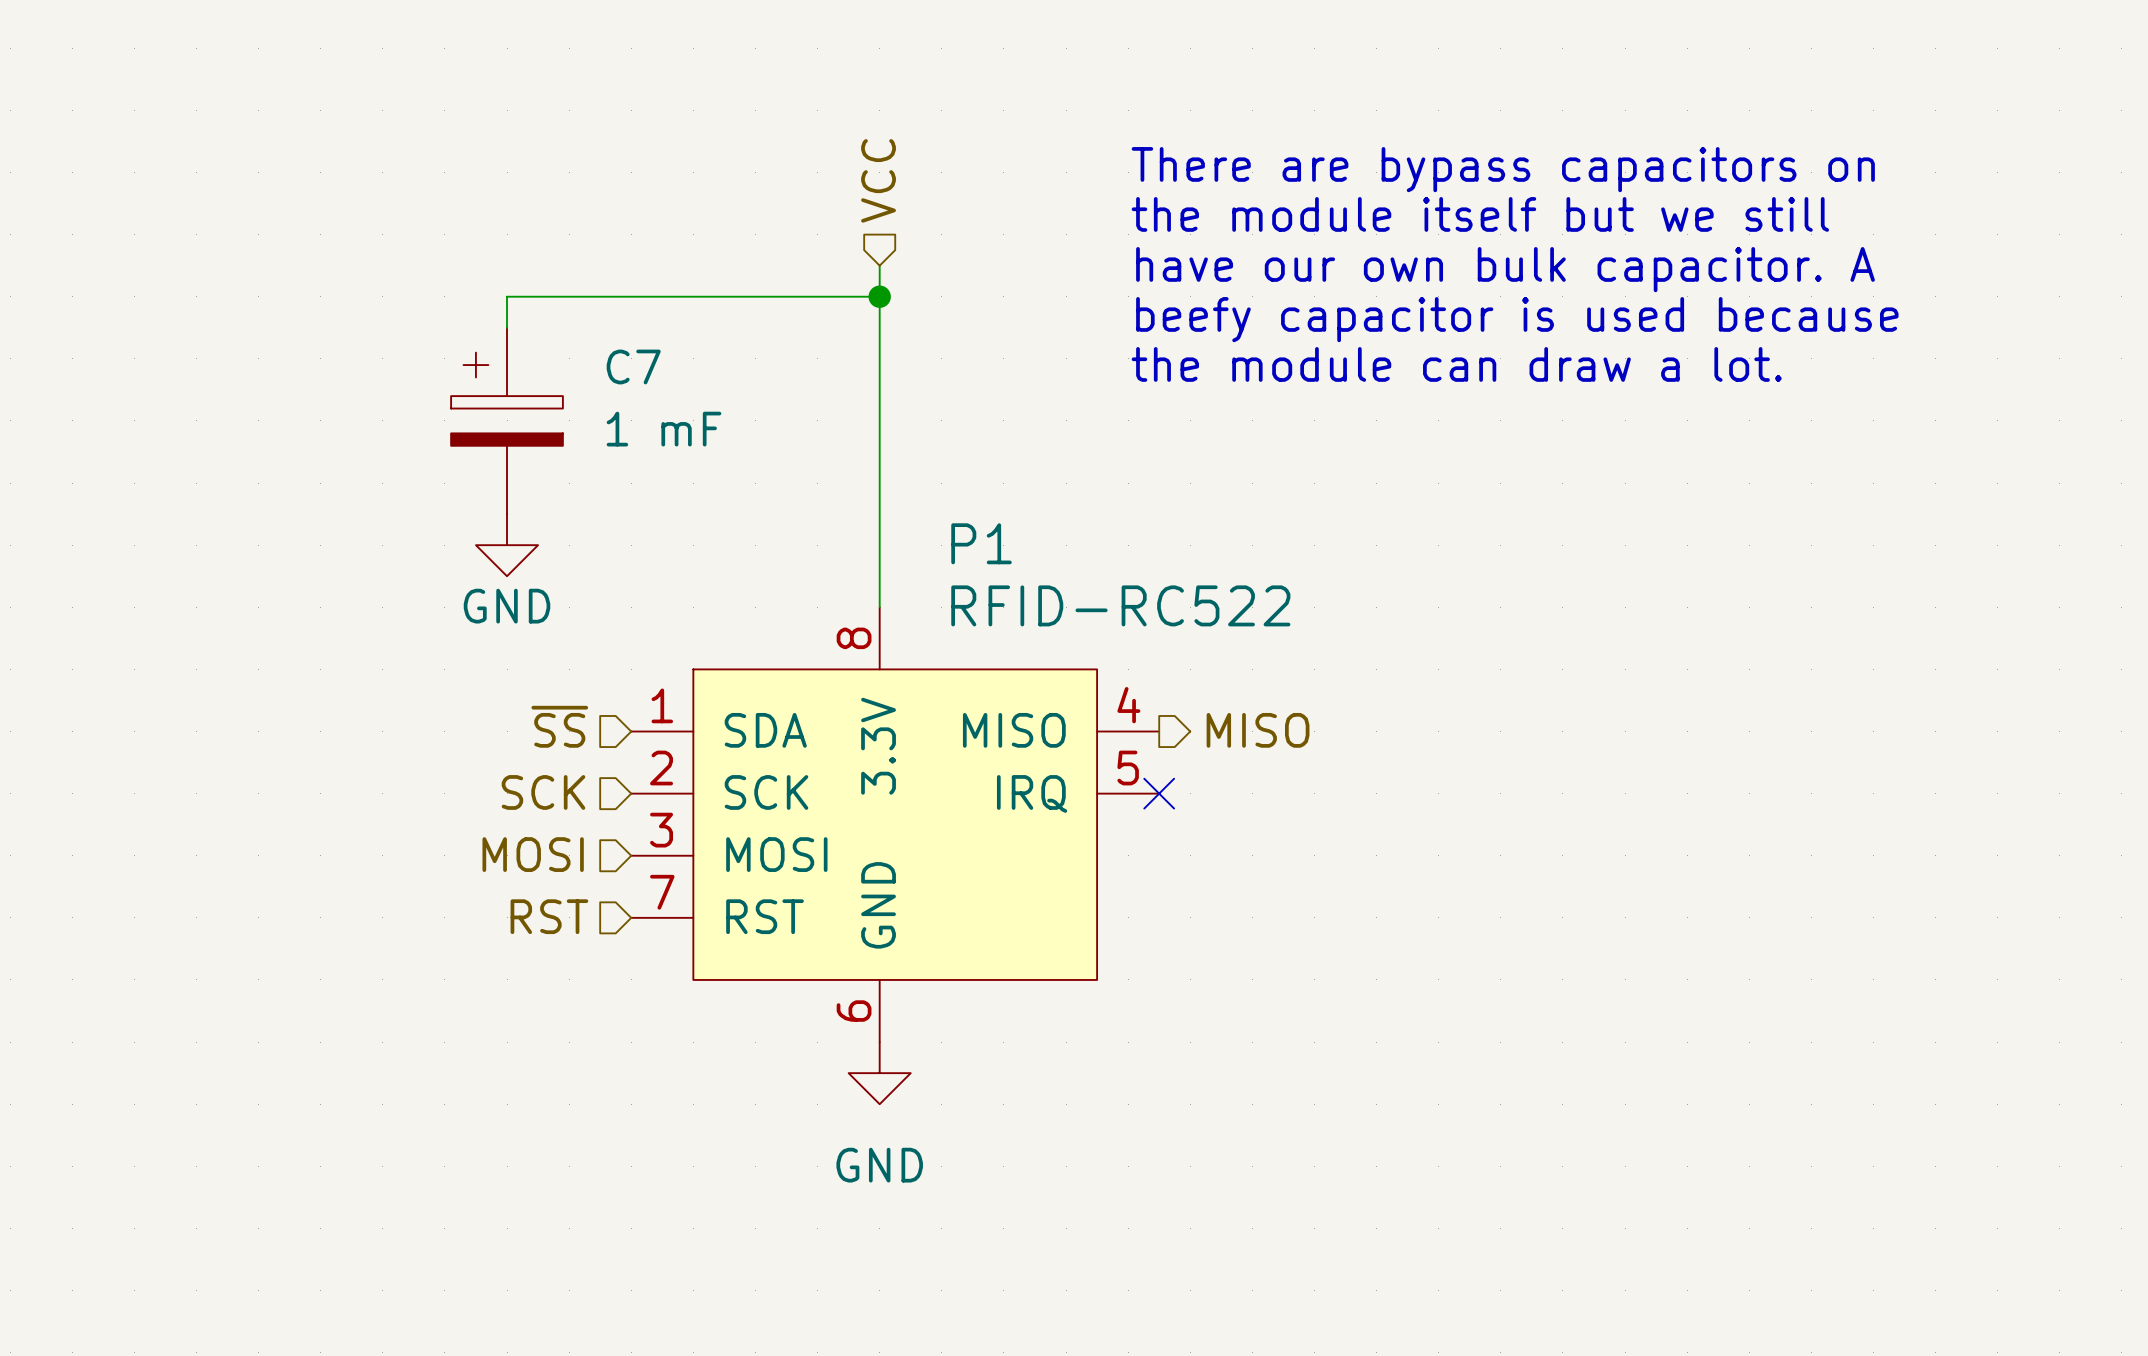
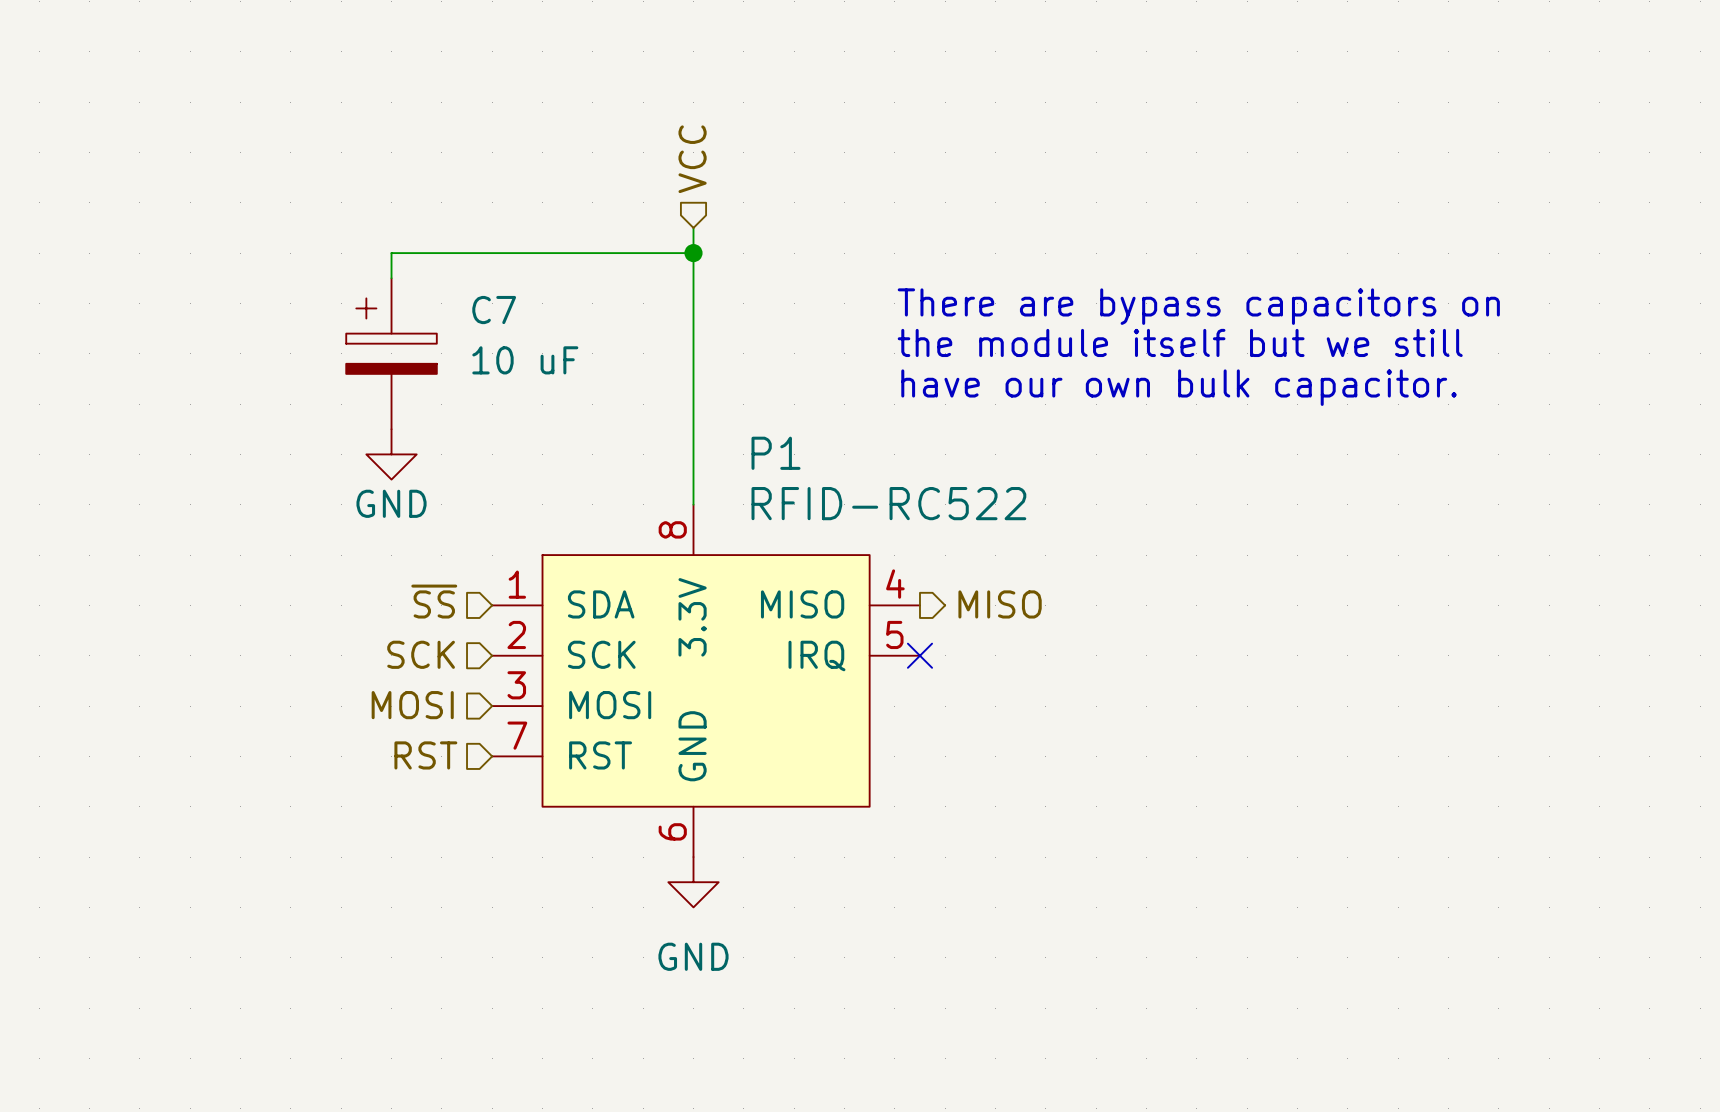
text: There are bypass capacitors on (1503, 169) -> none
text position: the module itself but we still (1480, 214) -> the module itself but we still (1180, 342)
text: have our own bulk capacitor. A (1505, 269) -> none
text: beefy capacitor is used because (1517, 319) -> none
text: the module can draw a lot. (1456, 364) -> There are bypass capacitors on (1198, 306)
C7 value: 1 mF (664, 429) -> 10 uF (525, 360)
text: none -> have our own bulk capacitor. (1179, 387)

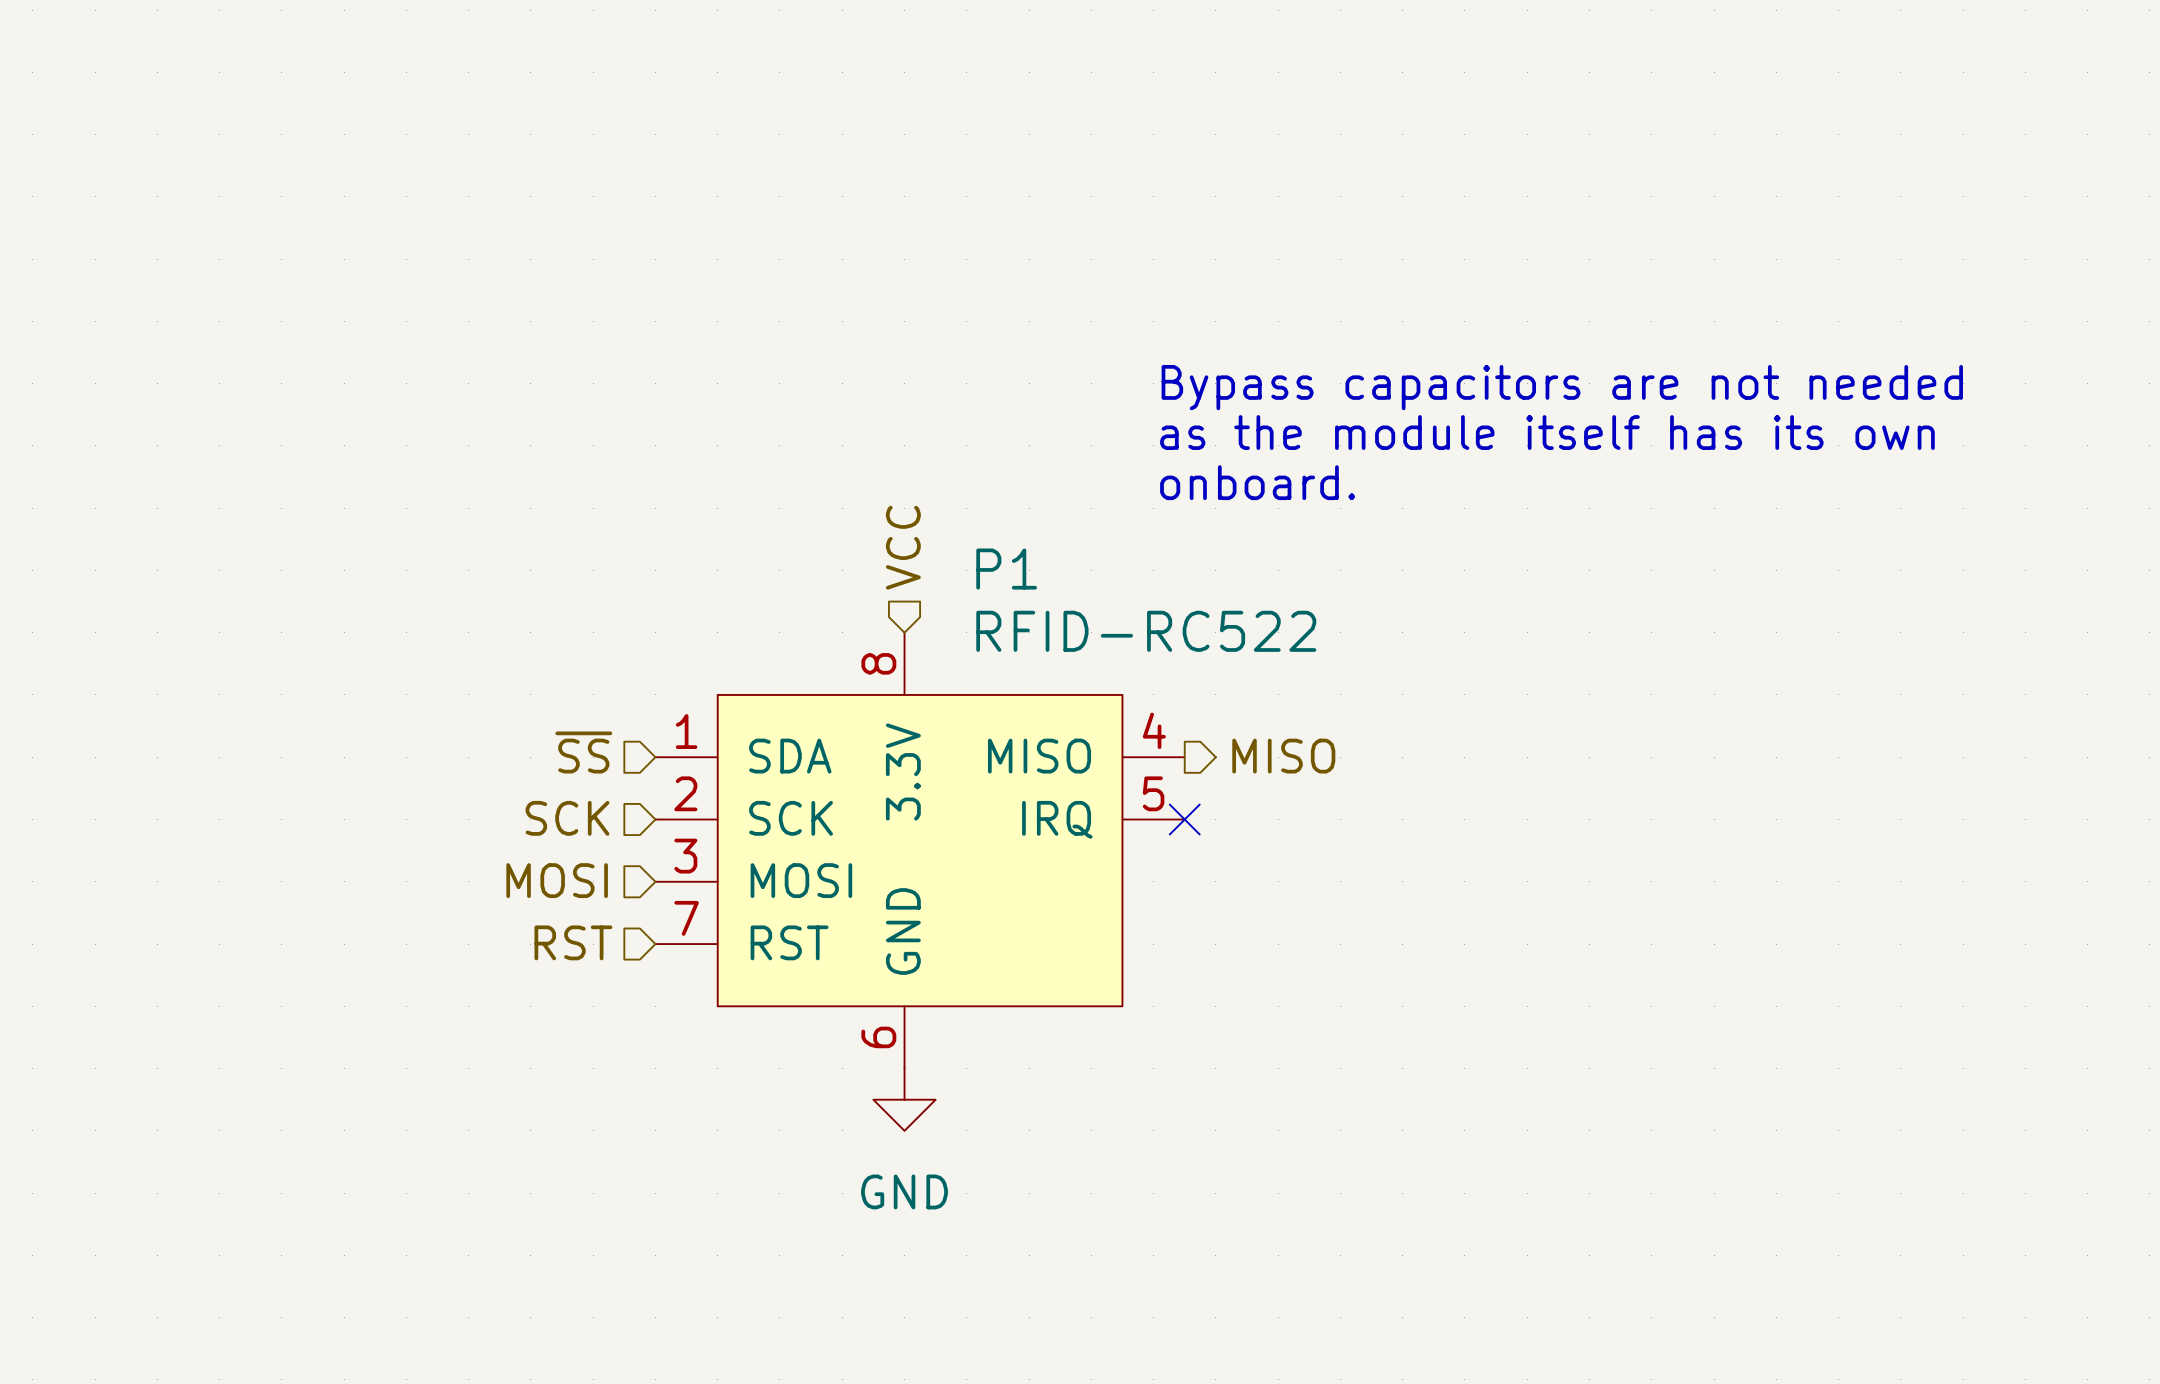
hierarchical label position: VCC (692, 159) -> VCC (903, 547)
wire: (693, 227) (693, 504) -> none
wire: (693, 253) (391, 253) (391, 278) -> none
junction: (693, 253) -> none
text: There are bypass capacitors on (1198, 306) -> Bypass capacitors are not needed (1562, 387)
text: the module itself but we still (1180, 342) -> as the module itself has its own (1547, 432)
C7: 10 uF (391, 353) -> none
text: have our own bulk capacitor. (1179, 387) -> onboard. (1257, 482)
power symbol: GND (391, 454) -> none

